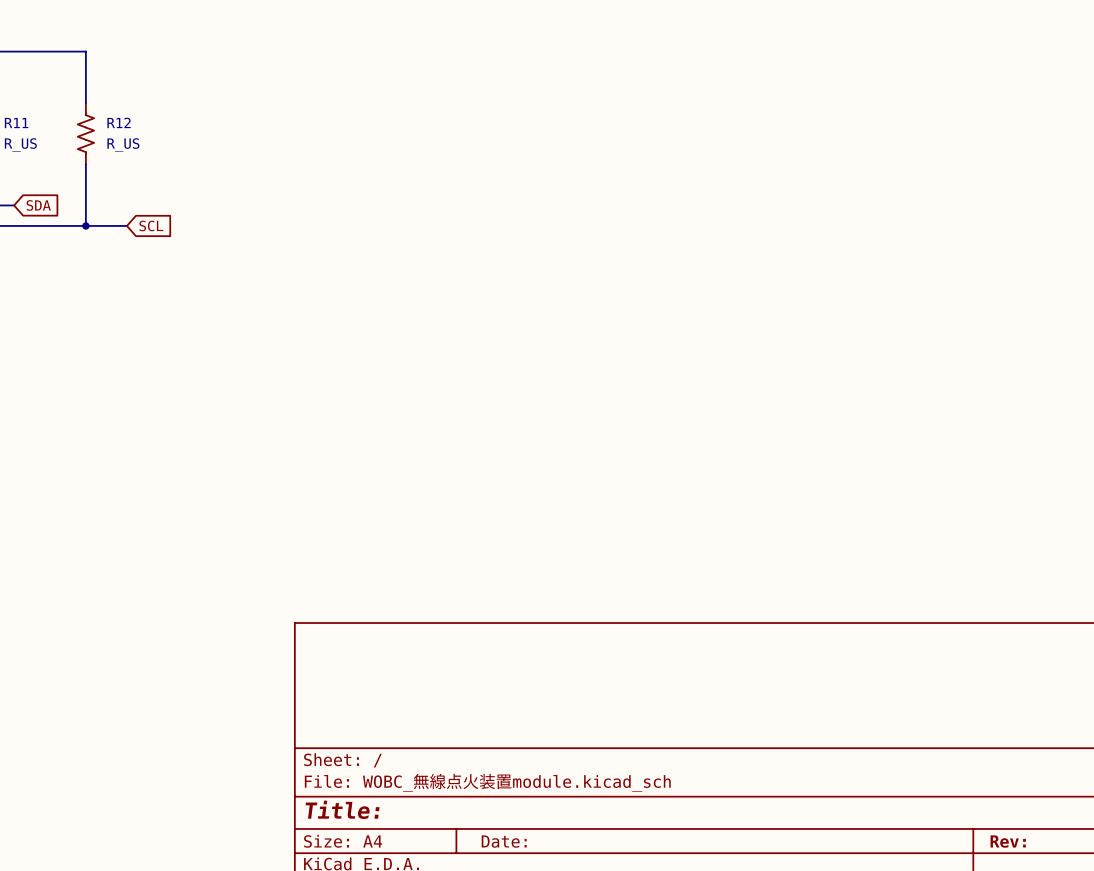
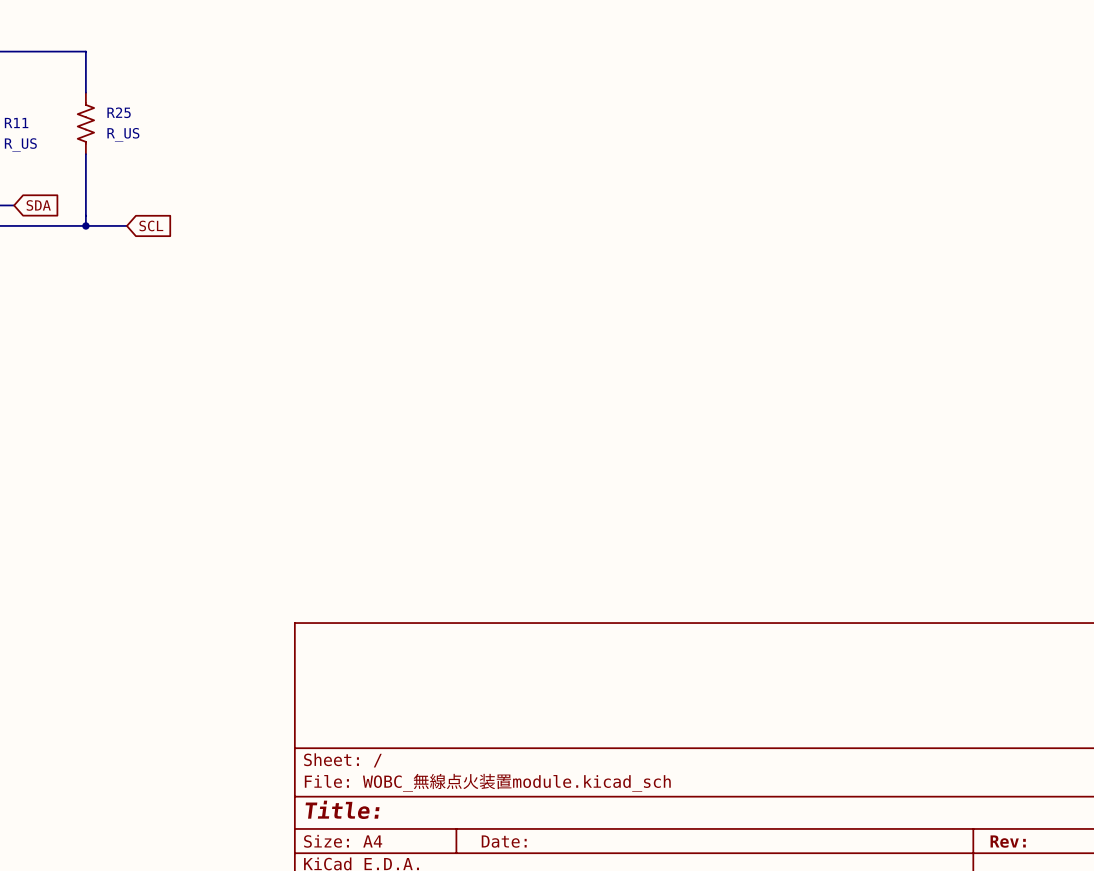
R25: none -> R_US (85, 123)
R12: R_US (85, 133) -> none

